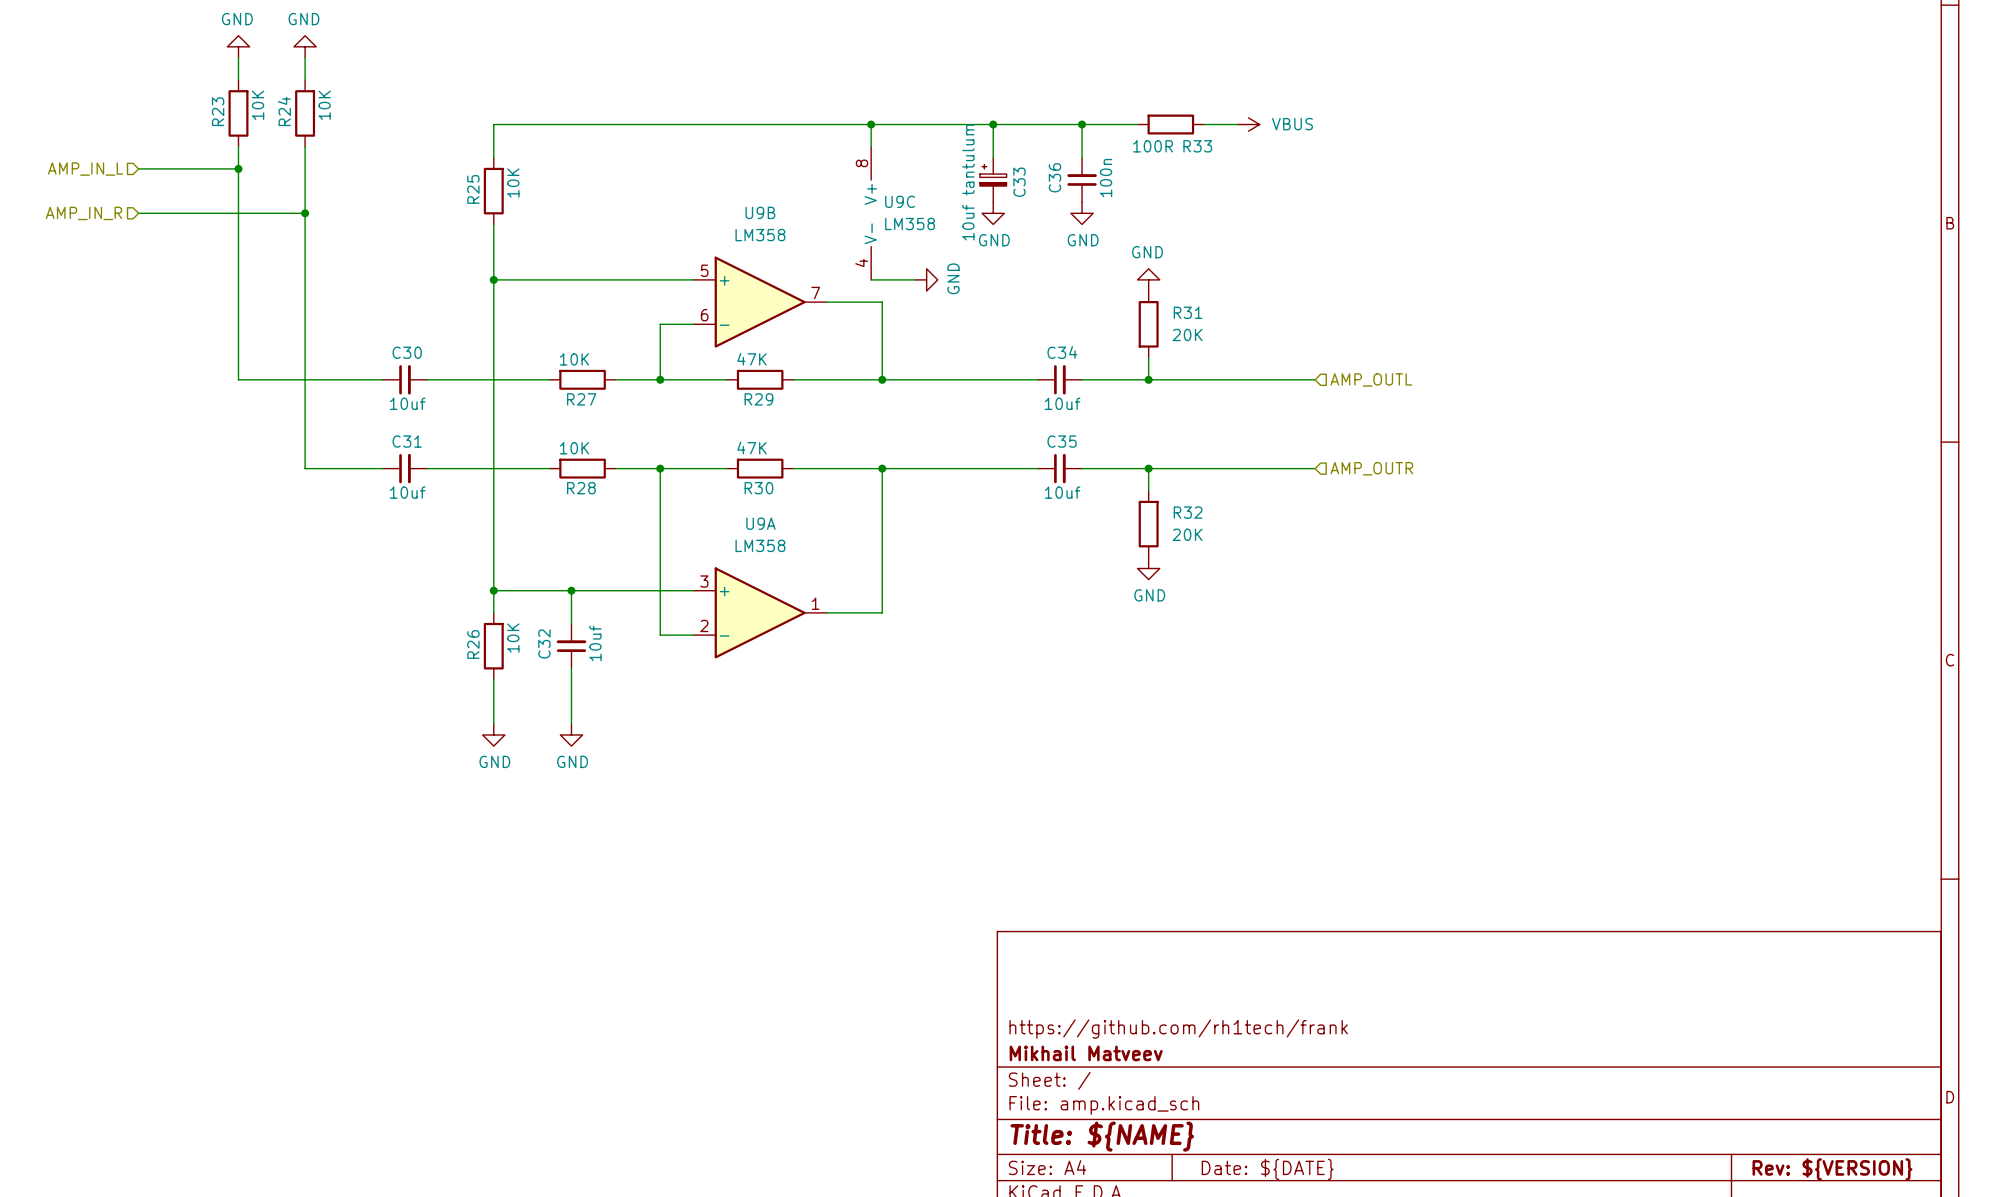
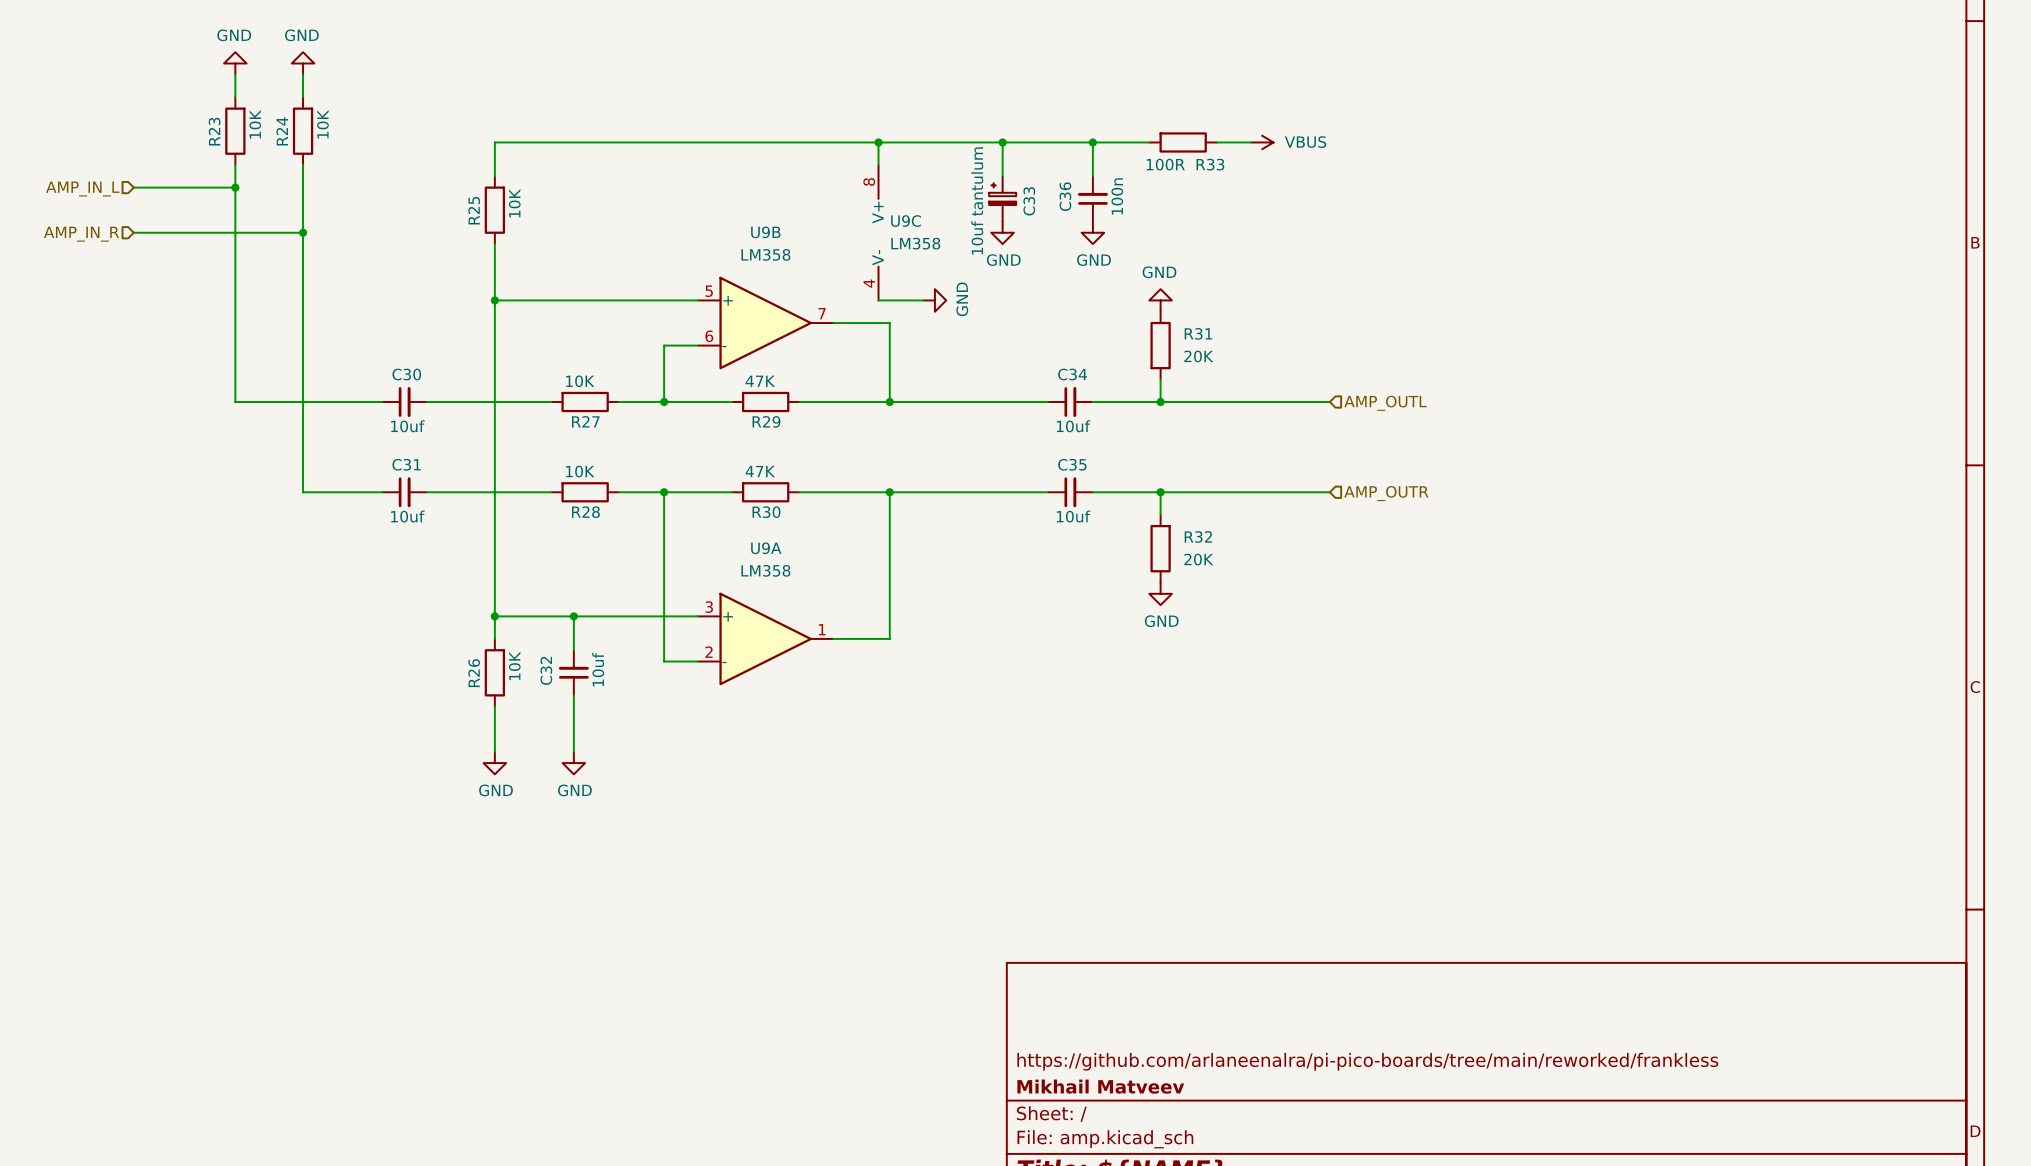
title block: https://github.com/rh1tech/frank (1178, 1029) -> https://github.com/arlaneenalra/pi-pico-boards/tree/main/reworked/frankless (1367, 1061)

